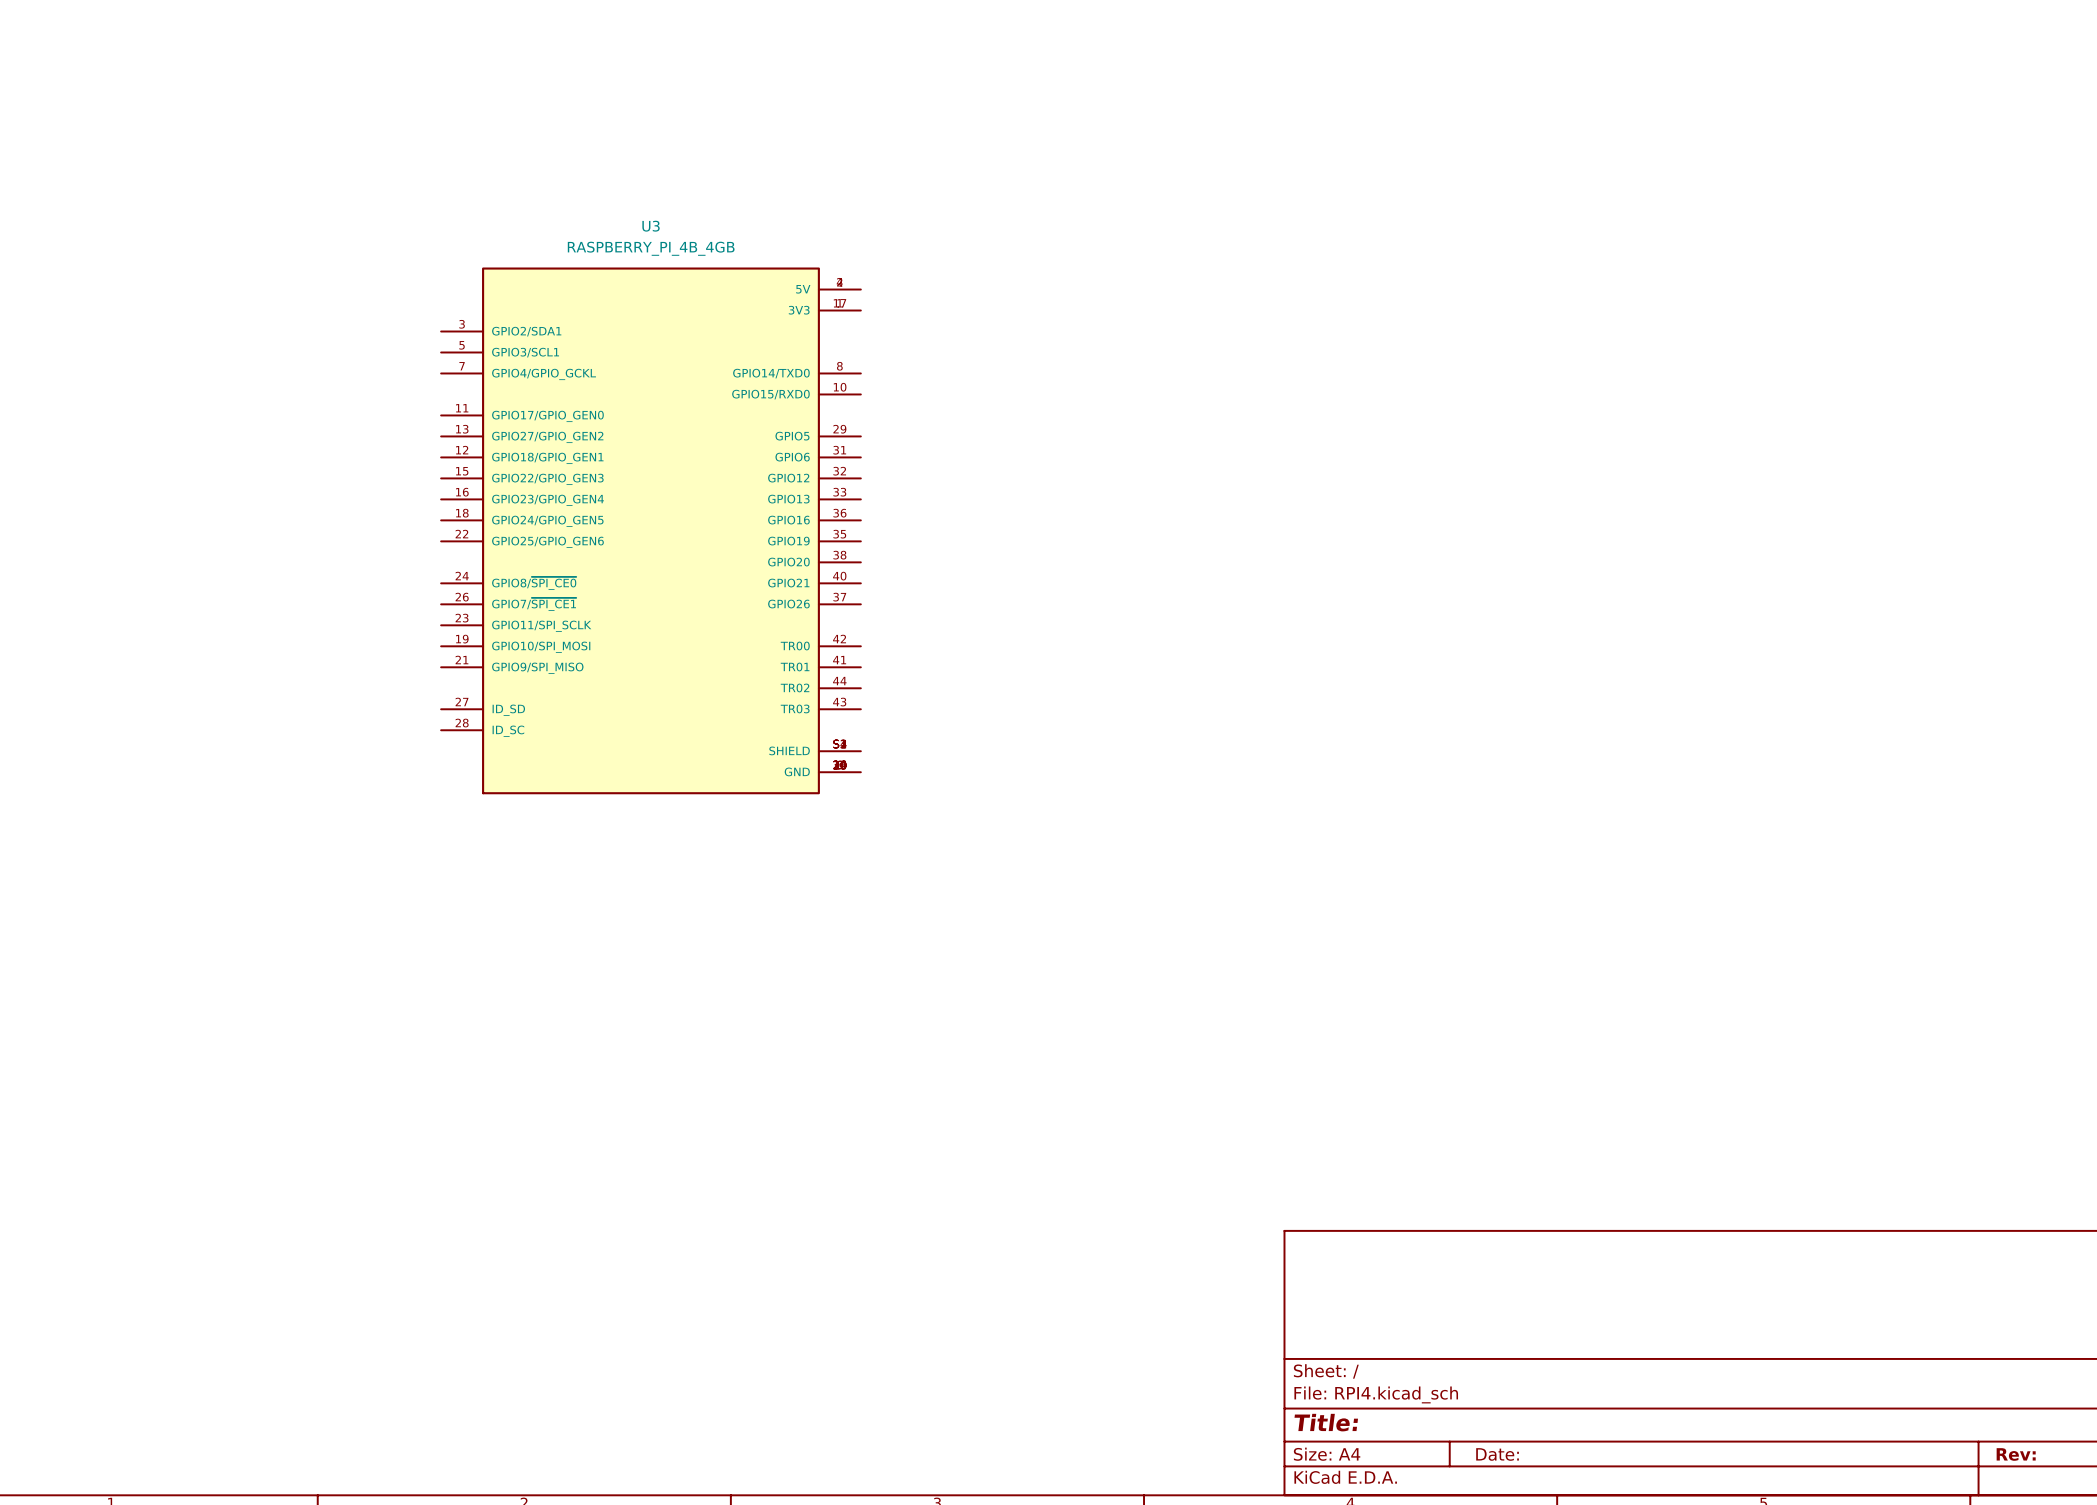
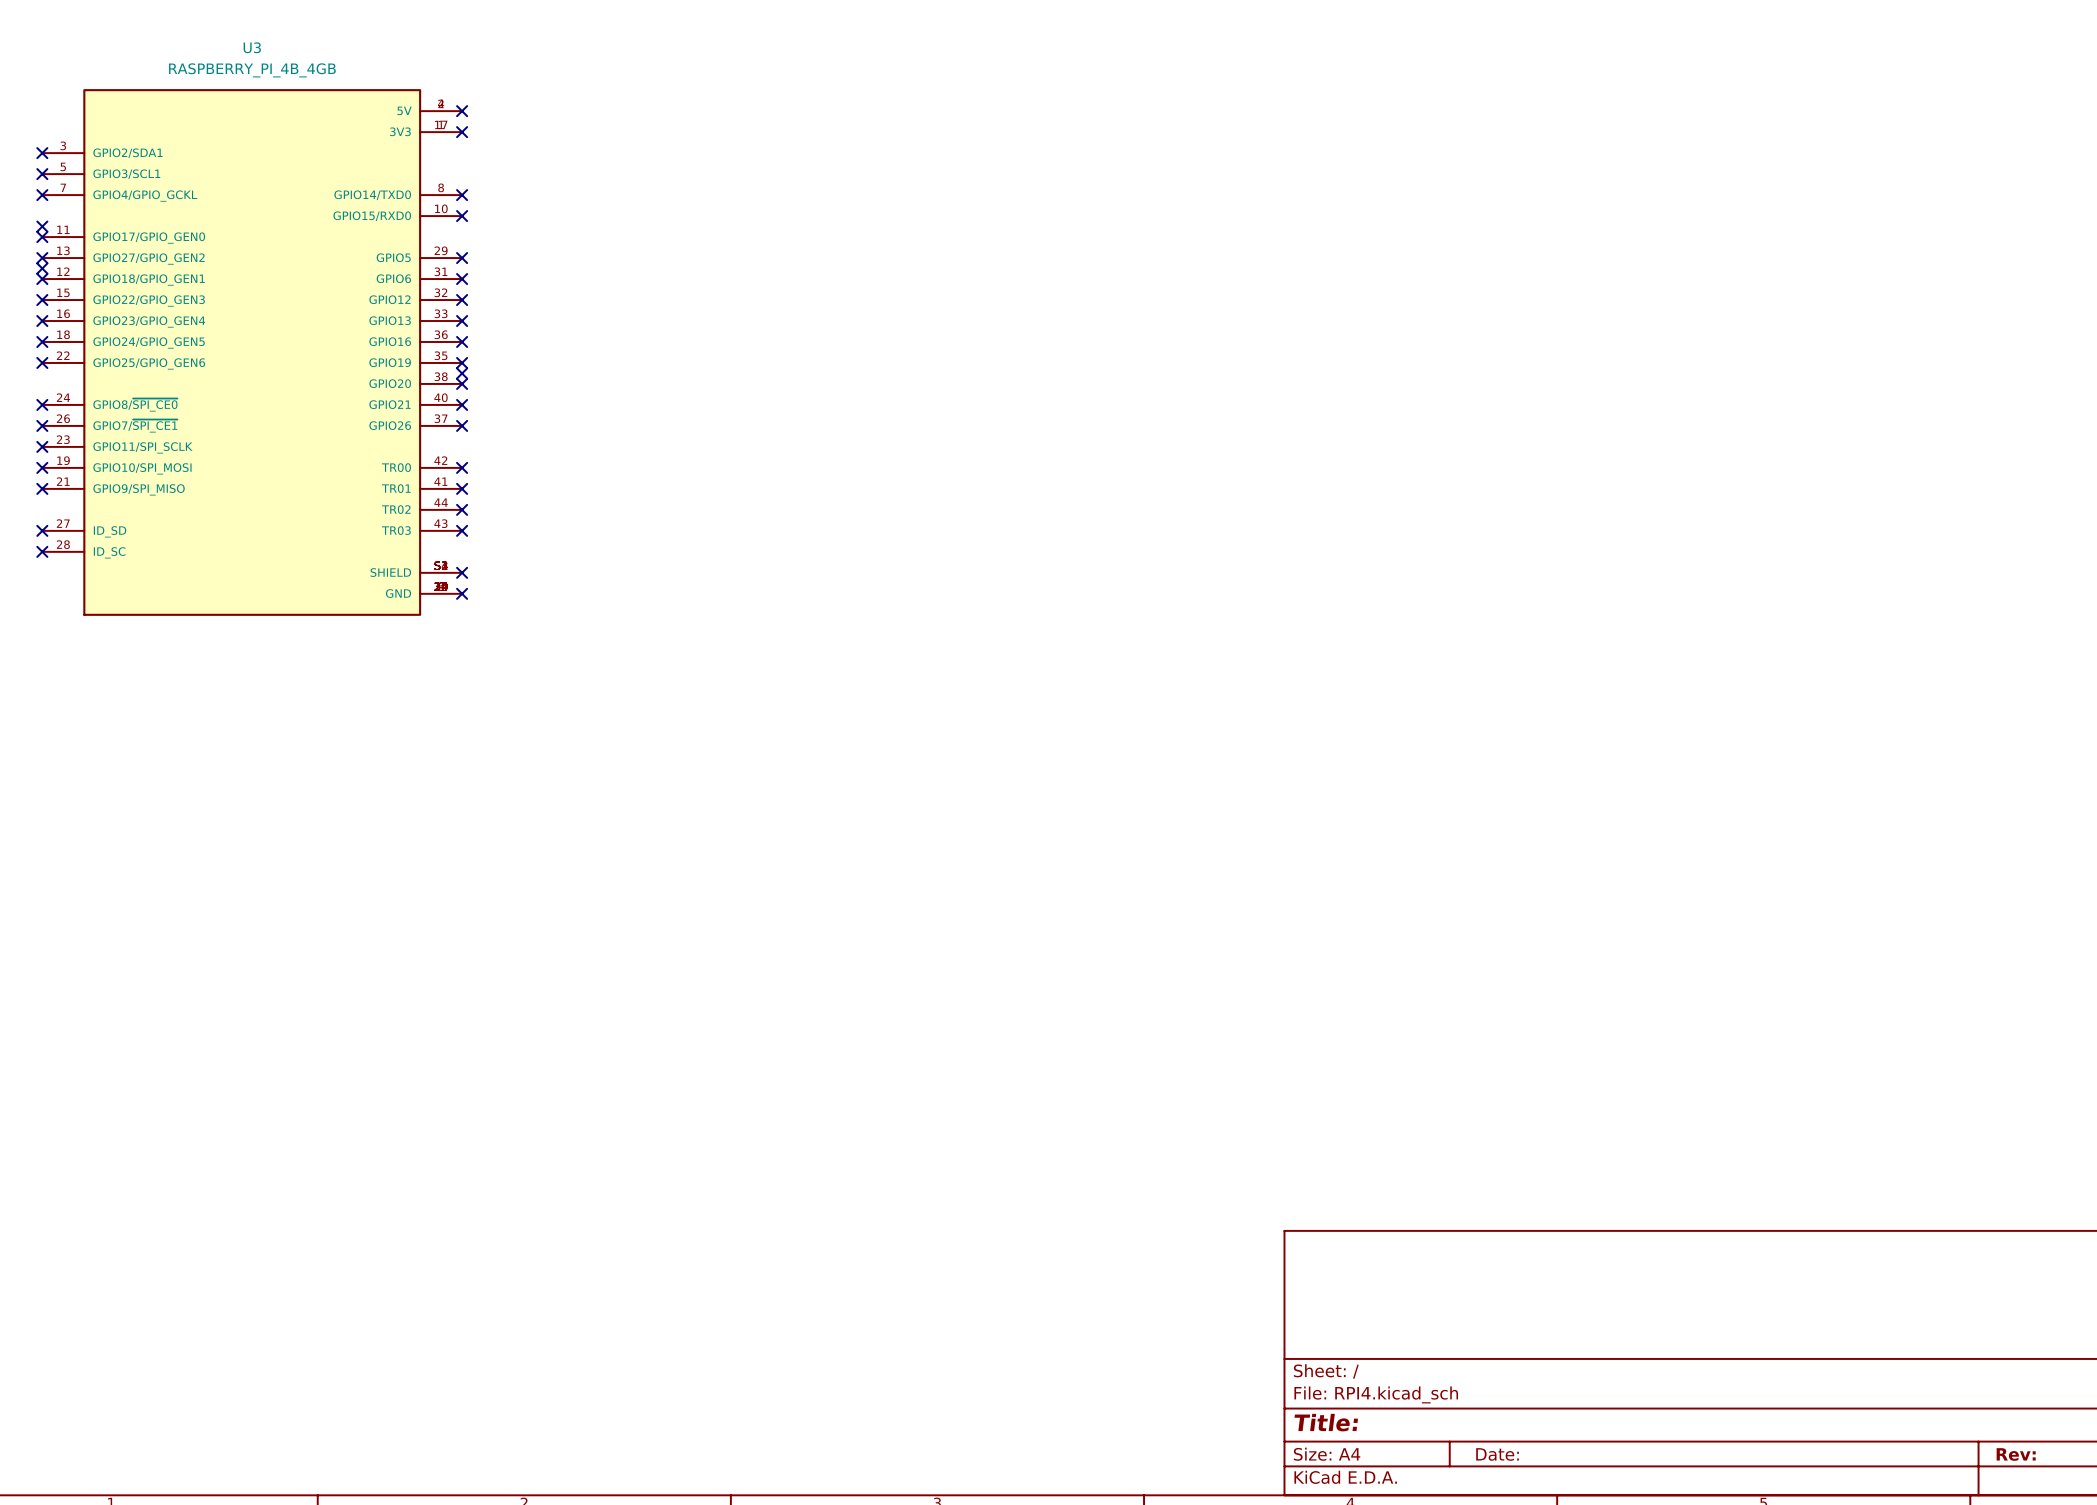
no-connect mark: none -> (462, 111)
no-connect mark: none -> (462, 132)
no-connect mark: none -> (42, 153)
no-connect mark: none -> (42, 174)
no-connect mark: none -> (42, 195)
no-connect mark: none -> (462, 195)
no-connect mark: none -> (462, 216)
no-connect mark: none -> (42, 226)
no-connect mark: none -> (42, 237)
no-connect mark: none -> (42, 258)
no-connect mark: none -> (462, 258)
no-connect mark: none -> (42, 268)
no-connect mark: none -> (42, 279)
no-connect mark: none -> (462, 279)
no-connect mark: none -> (42, 300)
no-connect mark: none -> (462, 300)
no-connect mark: none -> (42, 321)
no-connect mark: none -> (462, 321)
no-connect mark: none -> (42, 341)
no-connect mark: none -> (462, 341)
no-connect mark: none -> (42, 362)
no-connect mark: none -> (462, 362)
no-connect mark: none -> (462, 373)
no-connect mark: none -> (462, 383)
no-connect mark: none -> (42, 404)
no-connect mark: none -> (462, 404)
no-connect mark: none -> (42, 425)
no-connect mark: none -> (462, 425)
no-connect mark: none -> (42, 446)
no-connect mark: none -> (42, 467)
no-connect mark: none -> (462, 467)
no-connect mark: none -> (42, 488)
no-connect mark: none -> (462, 488)
no-connect mark: none -> (462, 509)
no-connect mark: none -> (42, 530)
no-connect mark: none -> (462, 530)
U3 position: (650, 530) -> (252, 352)
no-connect mark: none -> (42, 551)
no-connect mark: none -> (462, 572)
no-connect mark: none -> (462, 593)

